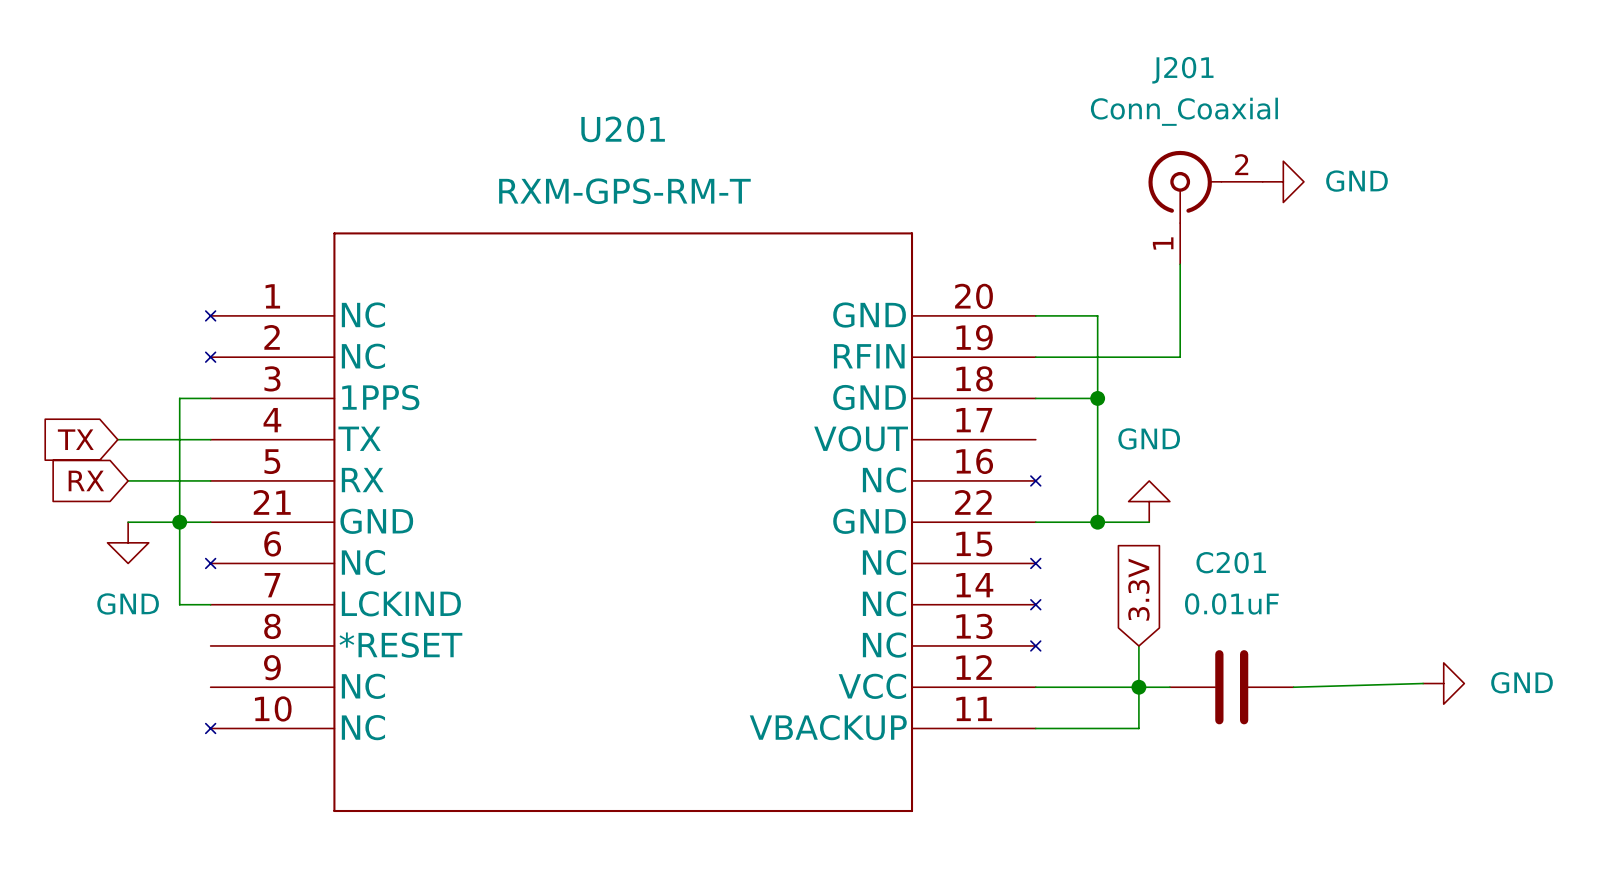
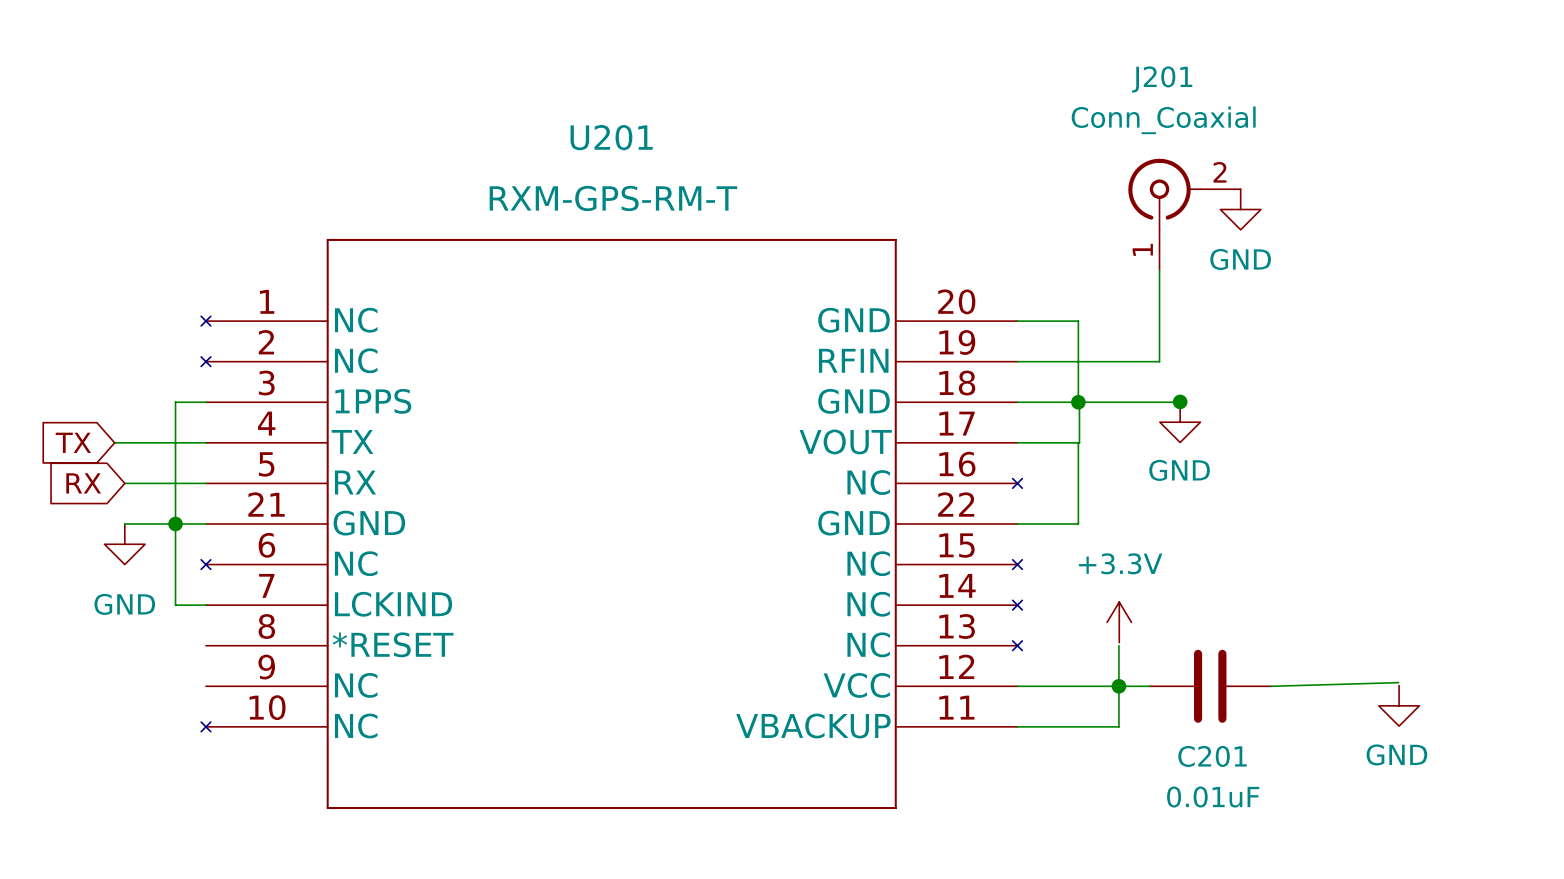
power symbol rotation: 0° (1283, 181) -> 90° clockwise (1240, 209)
power symbol position: GND (1283, 181) -> GND (1240, 209)
wire: (1097, 398) (1097, 439) -> (1078, 402) (1180, 401)
wire: none -> (1079, 402) (1079, 442) (1017, 442)
junction: none -> (1180, 401)
power symbol rotation: 0° (1149, 501) -> 180° (1180, 422)
power symbol position: GND (1149, 501) -> GND (1180, 422)
wire: (1097, 522) (1149, 522) -> none
junction: (1097, 522) -> none
C201 name position: C201 (1231, 562) -> C201 (1212, 756)
global label: 3.3V (1138, 589) -> none
C201 value position: 0.01uF (1231, 603) -> 0.01uF (1213, 797)
power symbol: none -> +3.3V (1119, 622)
power symbol text position: GND (1522, 682) -> GND (1396, 754)
power symbol rotation: 0° (1443, 683) -> 90° clockwise (1399, 705)
power symbol position: GND (1443, 683) -> GND (1399, 705)

